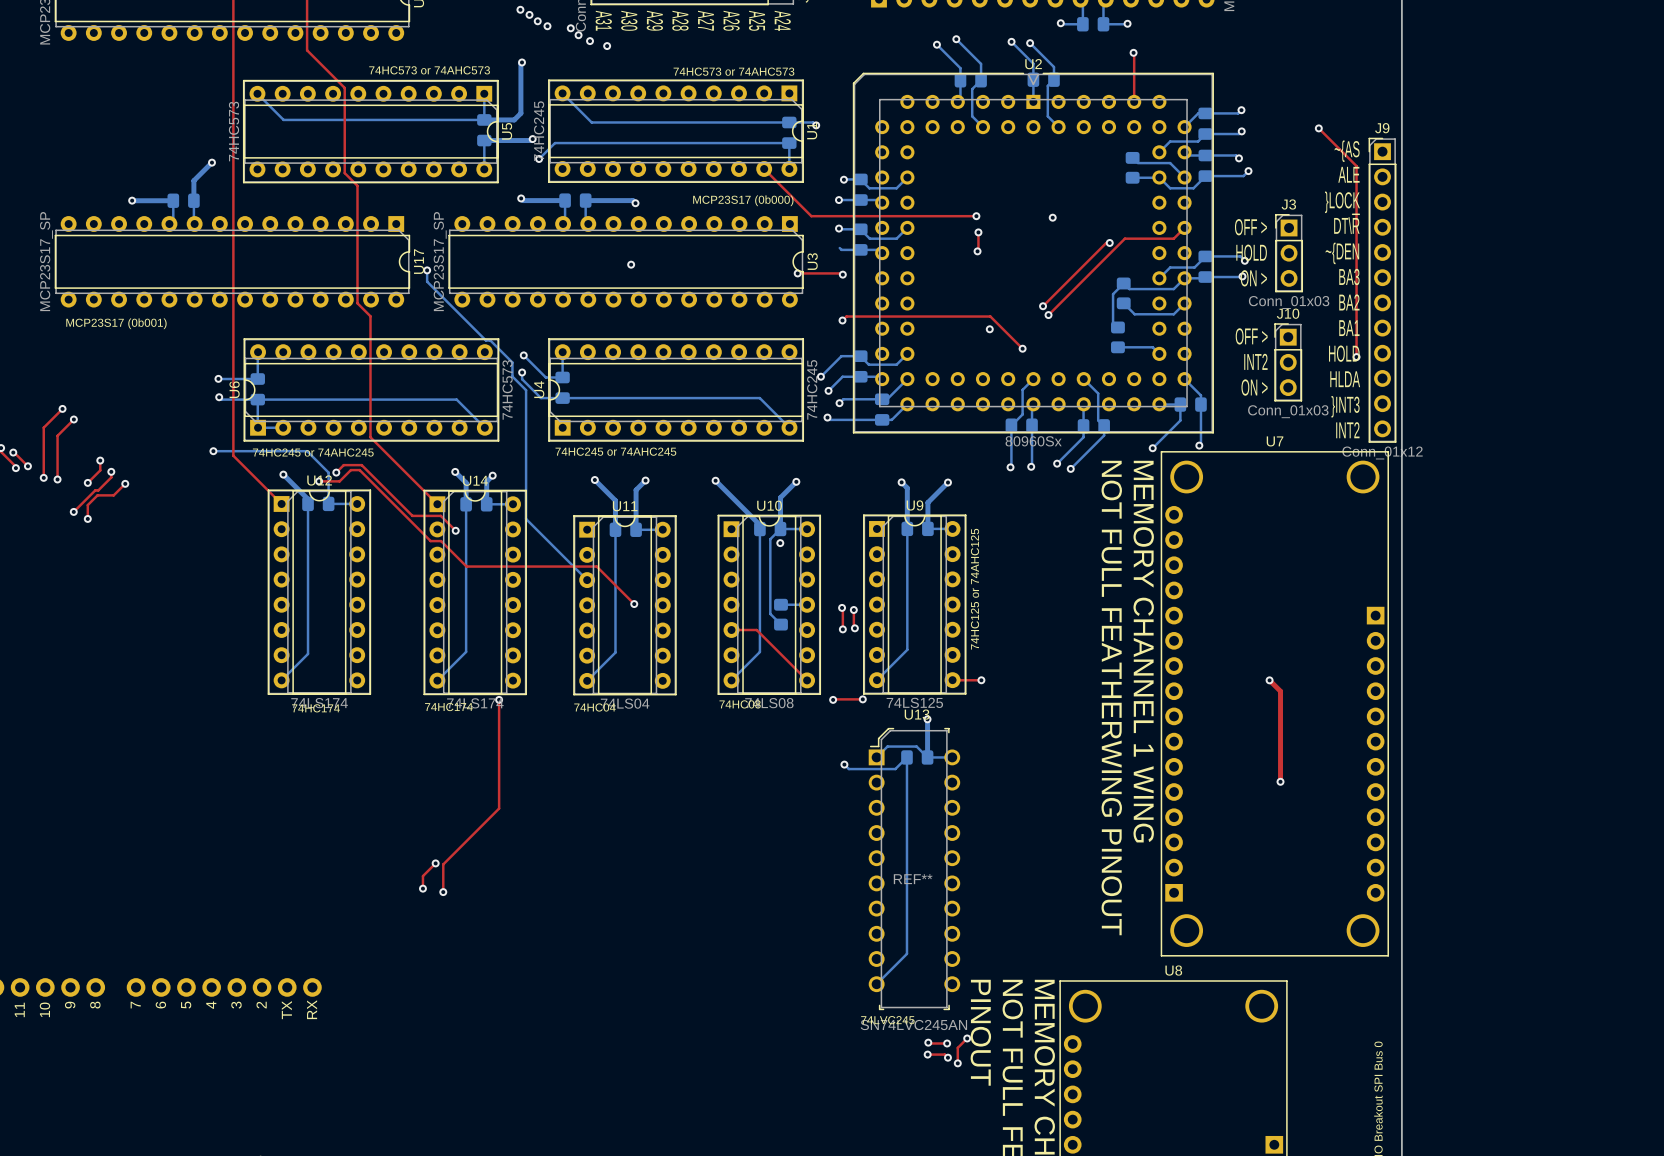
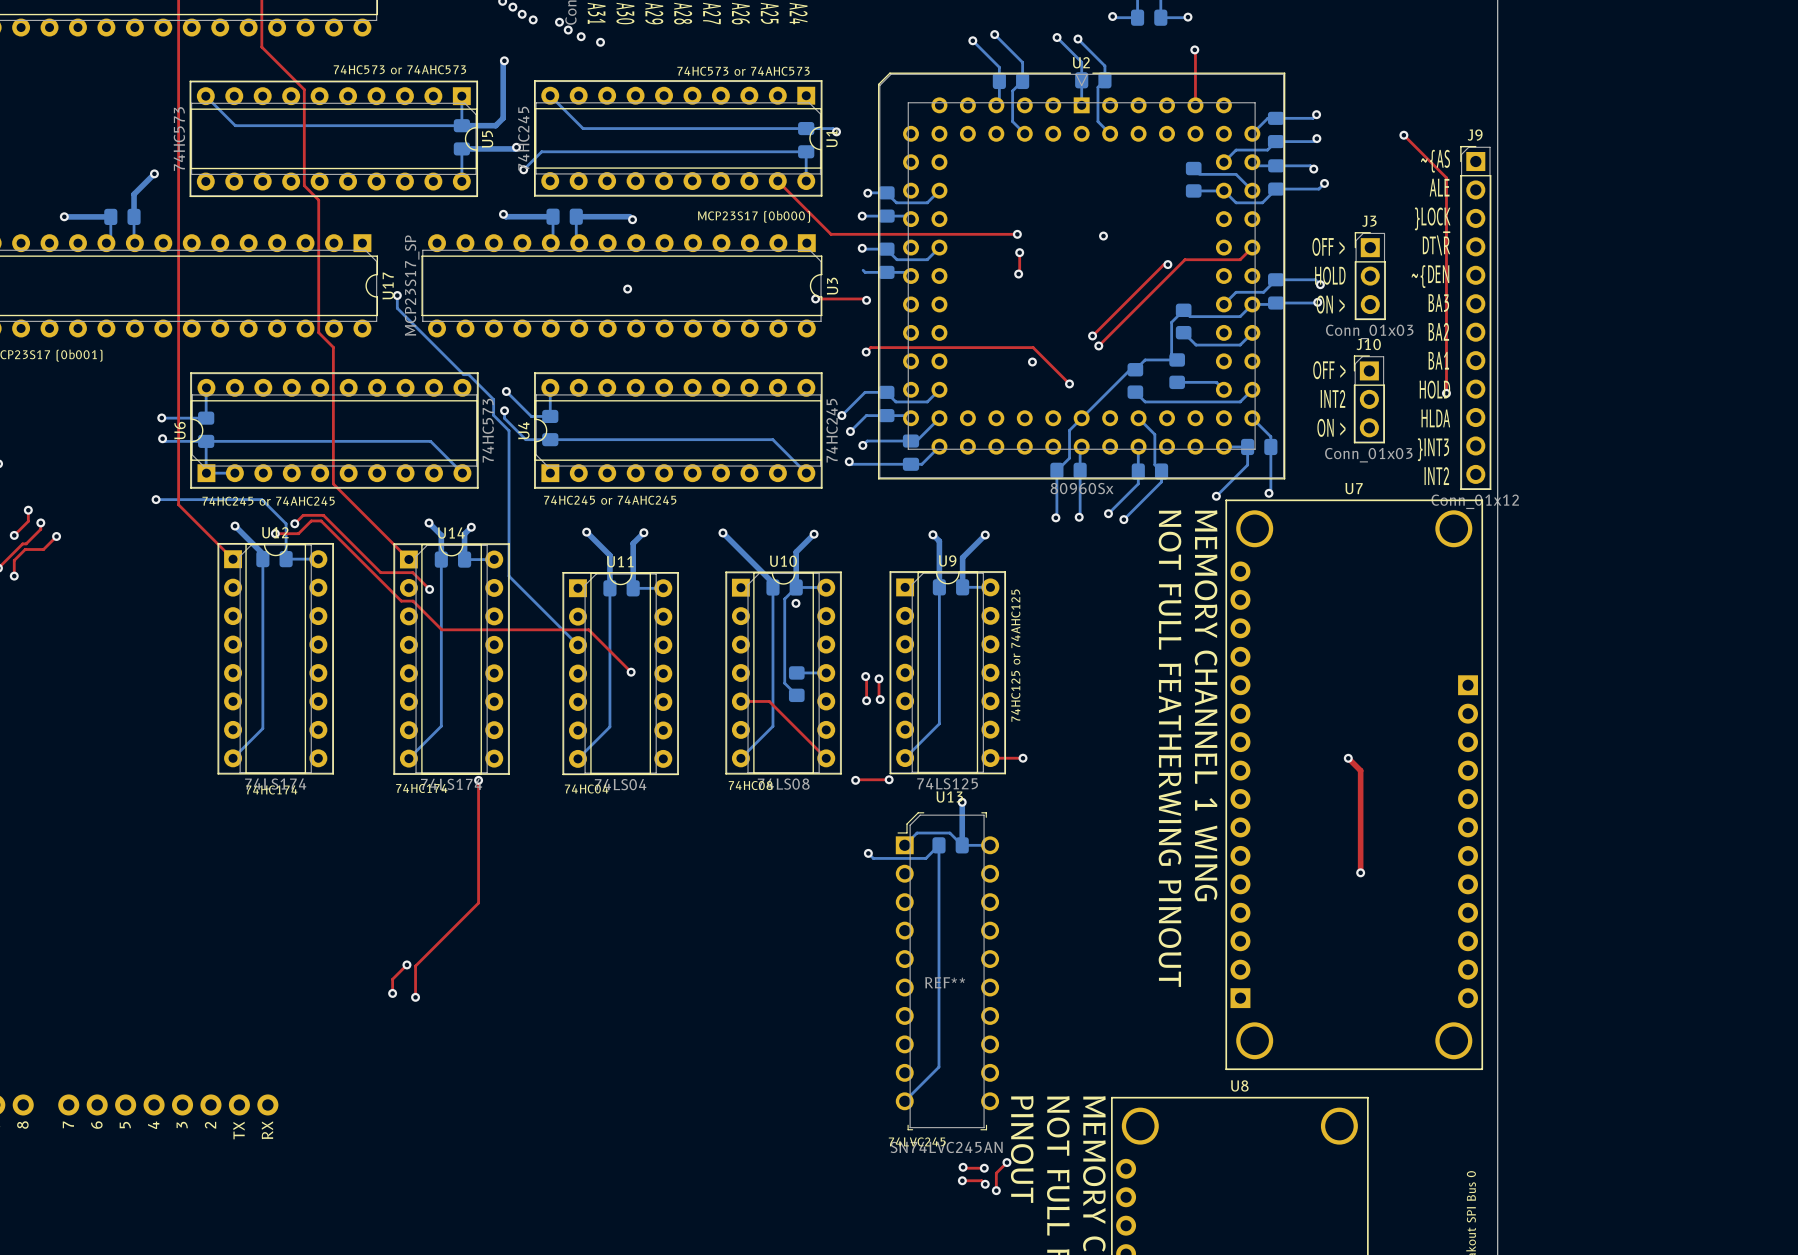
bottom track: none -> (1177, 359) (1145, 359) (1135, 369) (1130, 369) (1081, 418)
part: none -> (1135, 380)
bottom track: none -> (1252, 389) (1240, 401) (1145, 401) (1135, 392)

